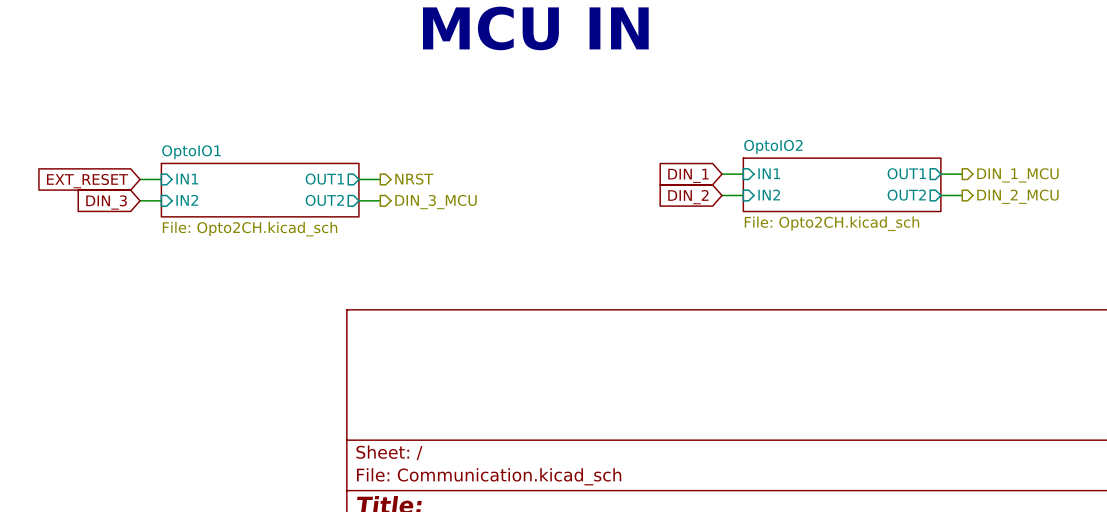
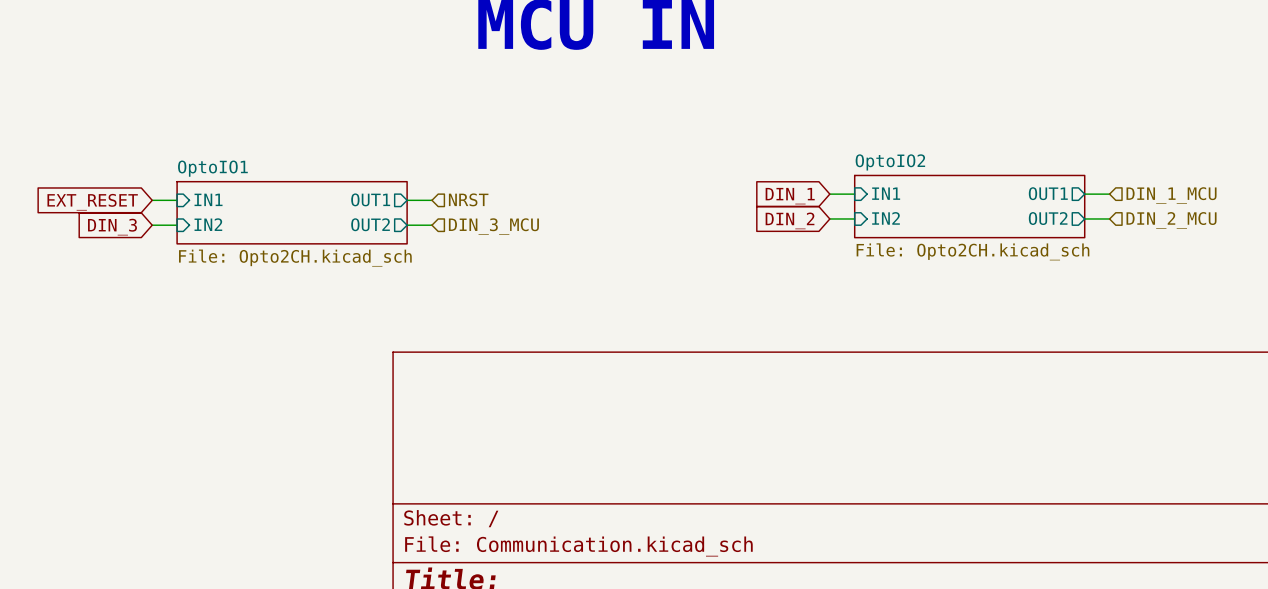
hierarchical label shape: output (1017, 175) -> input (1171, 195)
hierarchical label shape: output (414, 179) -> input (468, 199)
hierarchical label shape: output (1017, 196) -> input (1171, 220)
hierarchical label shape: output (435, 202) -> input (493, 226)

